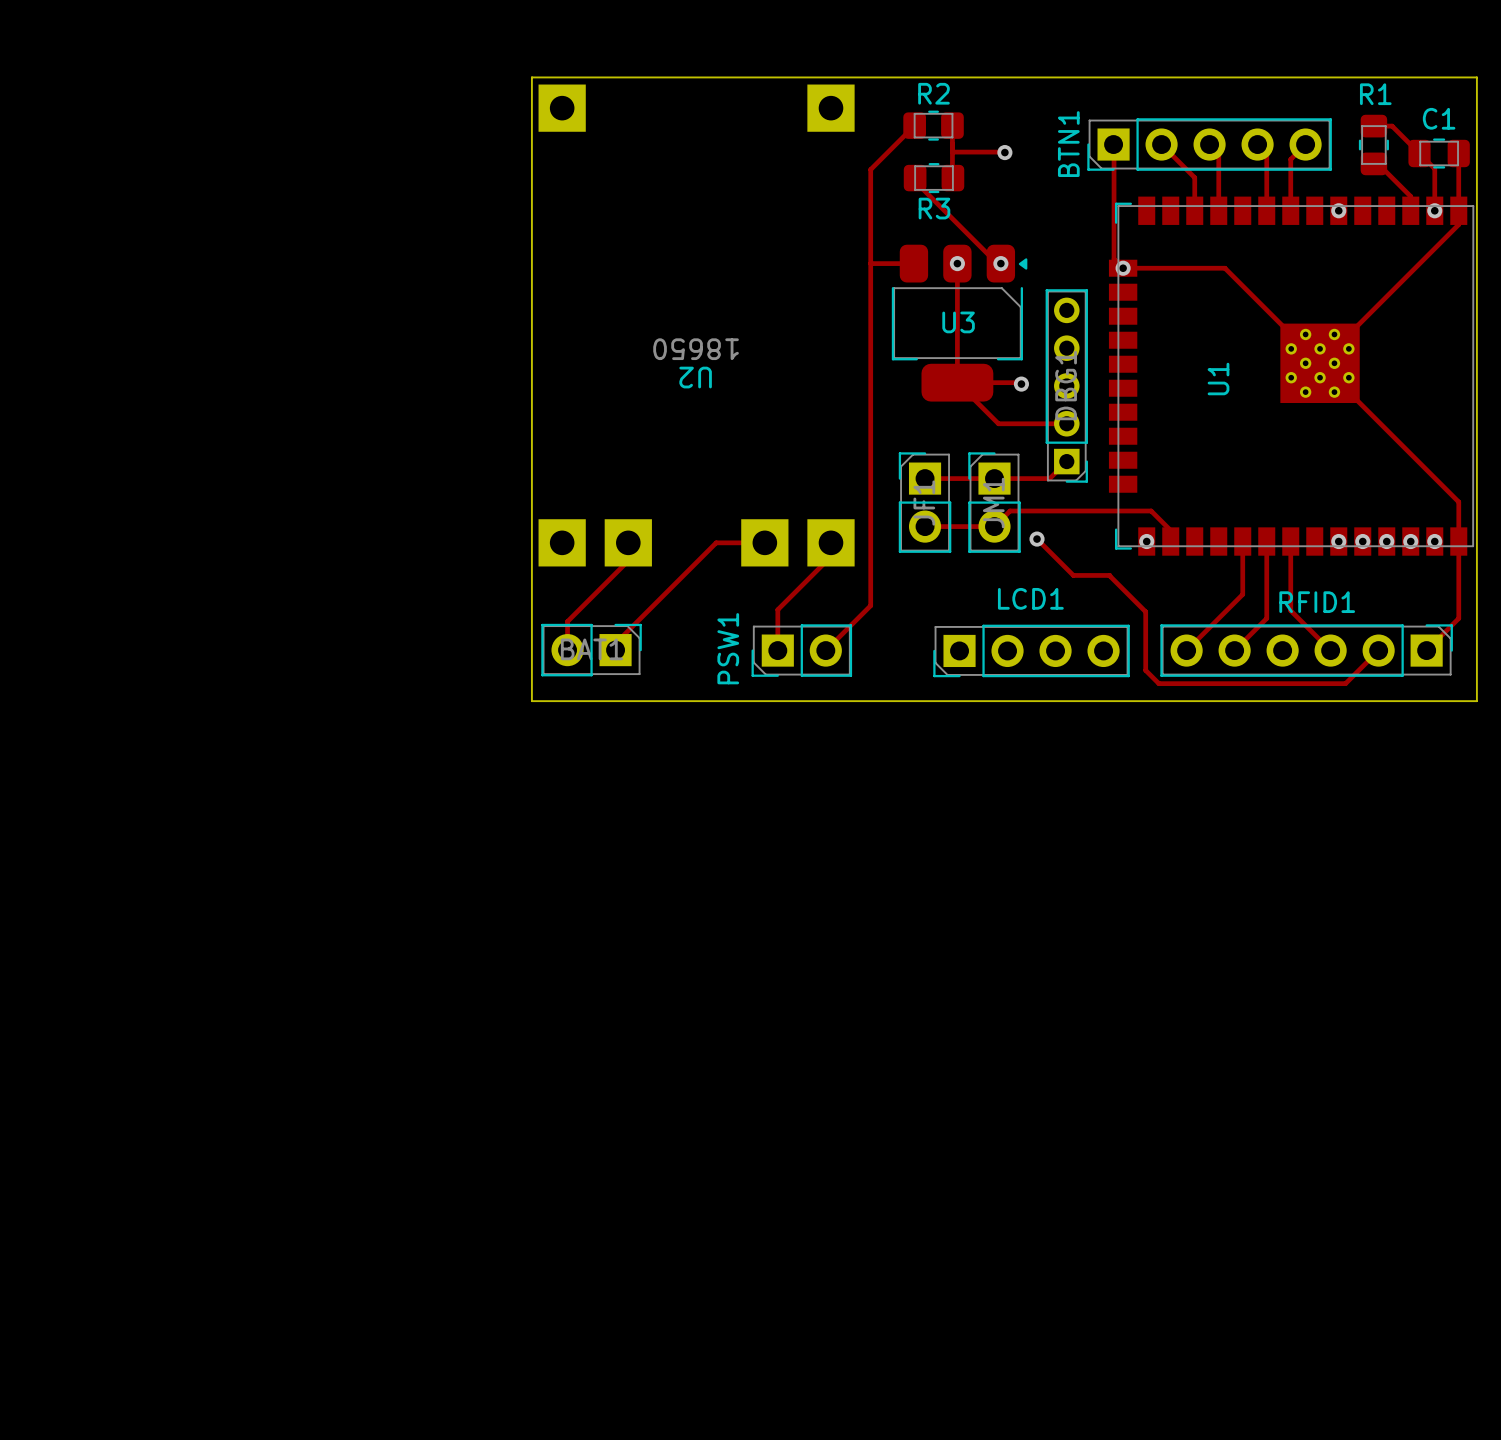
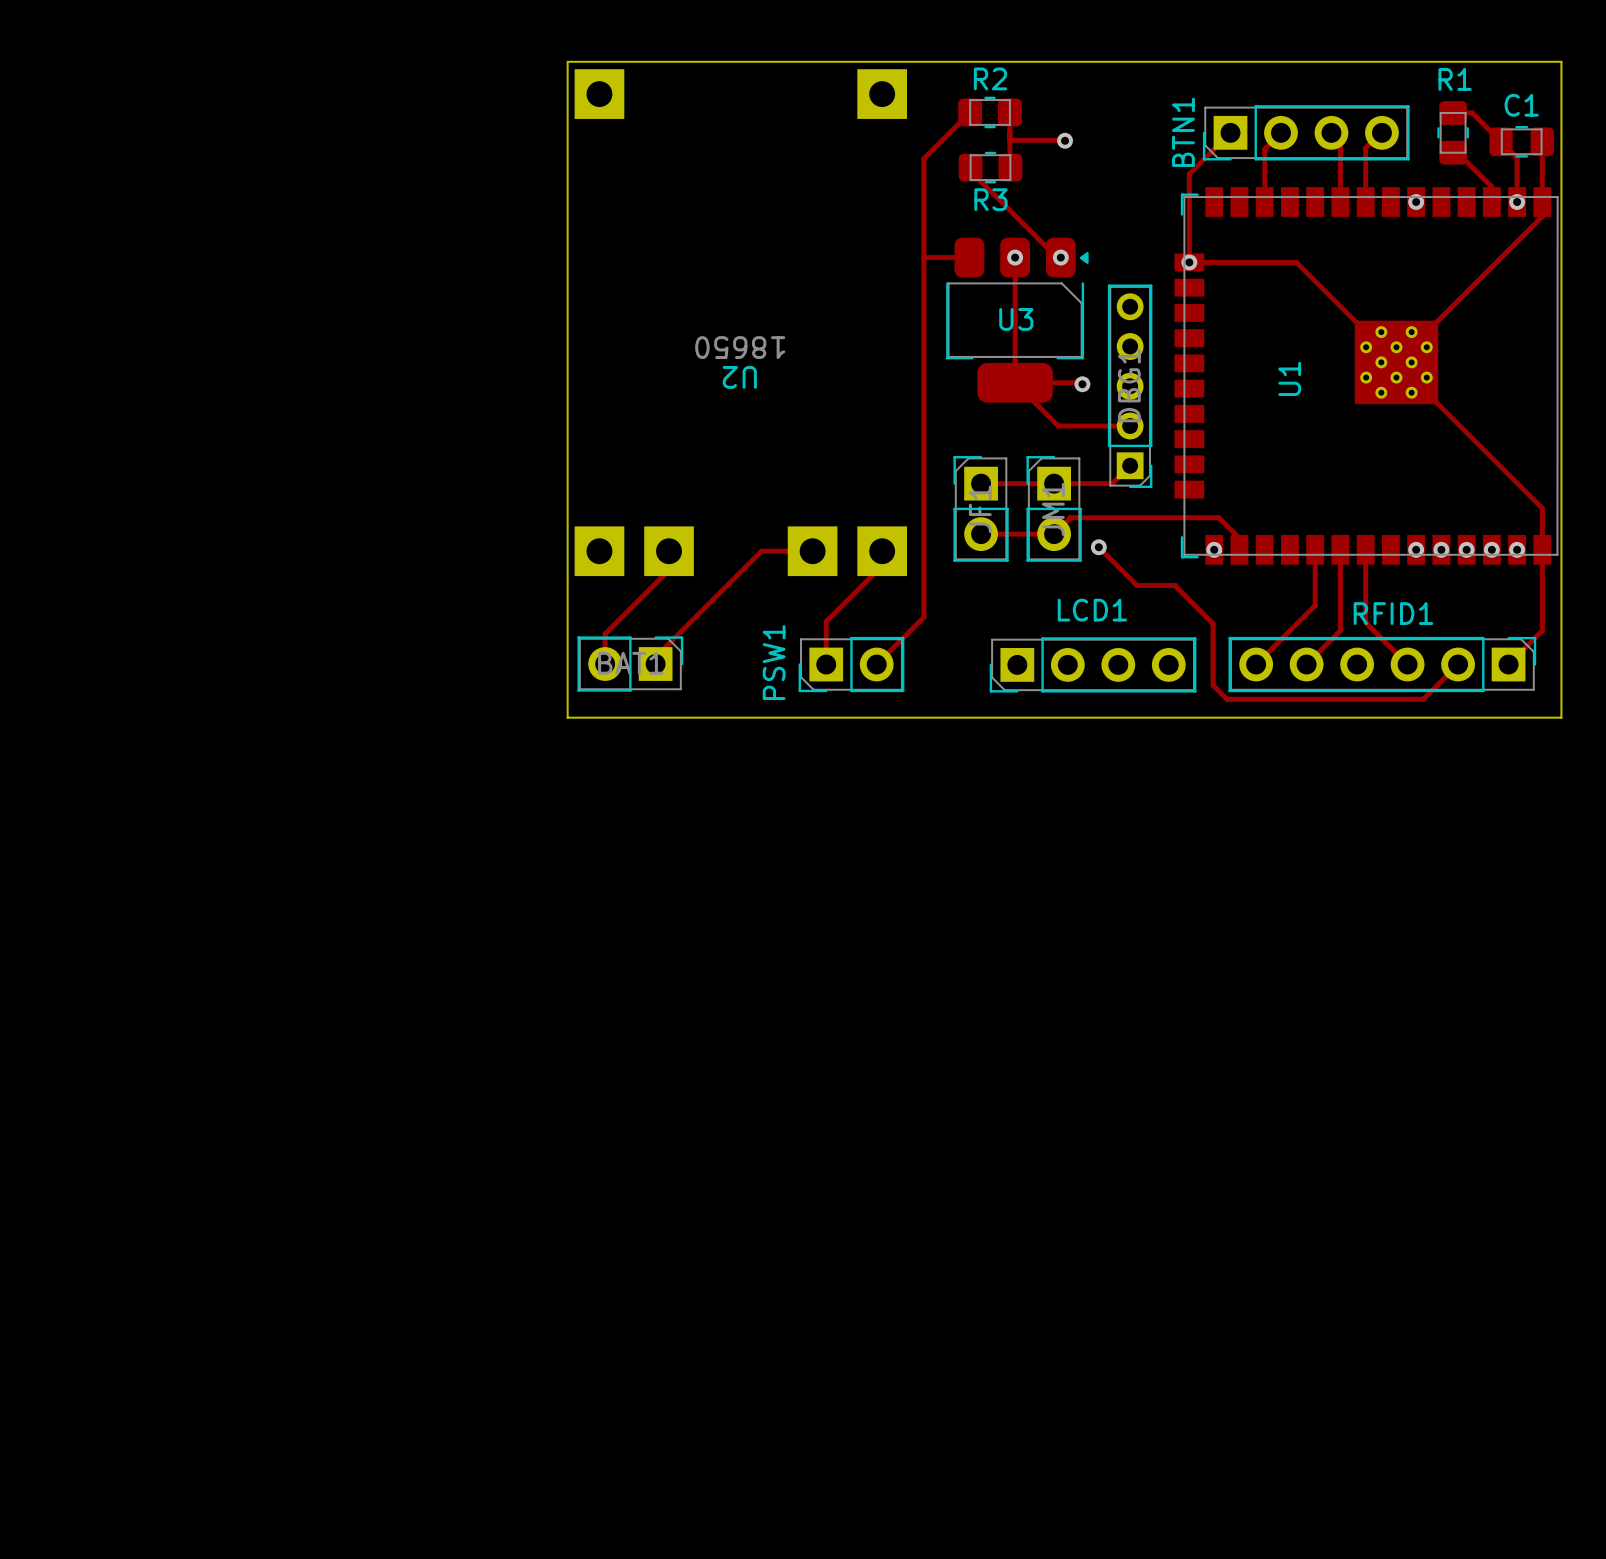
BTN1 footprint: [1087, 118, 1332, 171] -> [1202, 105, 1410, 161]
track: (1113, 144) (1114, 259) (1123, 268) -> (1230, 132) (1189, 173) (1189, 262)
track: (1161, 144) (1194, 177) (1194, 210) -> (1280, 132) (1264, 149) (1264, 201)
track: (1209, 144) (1218, 153) (1218, 210) -> none

